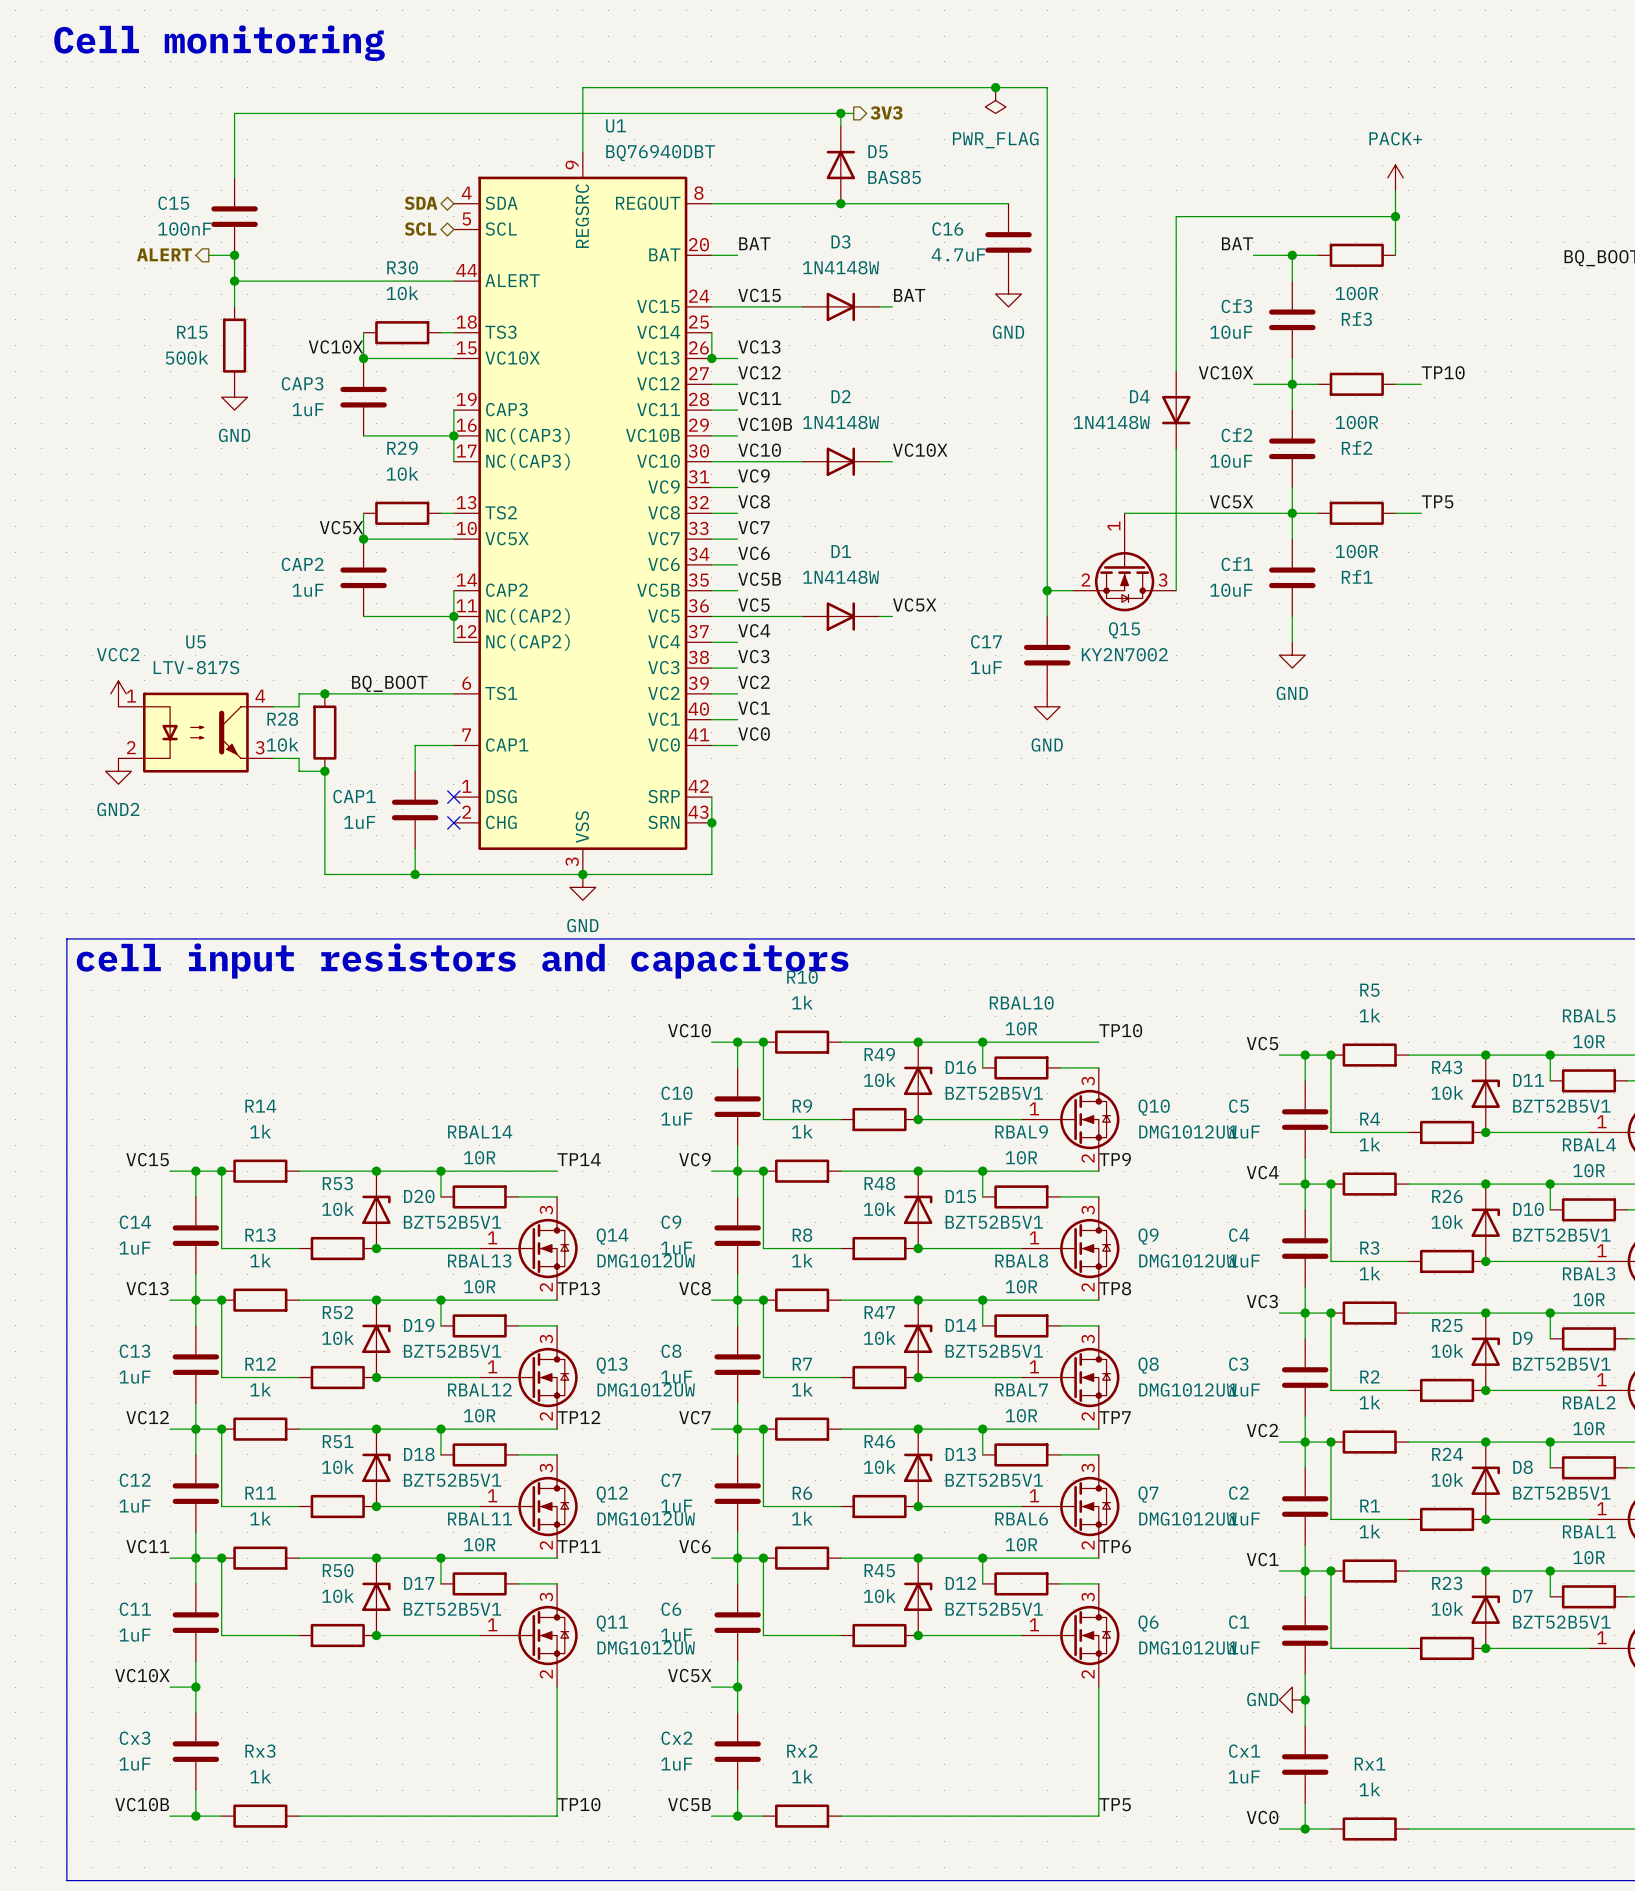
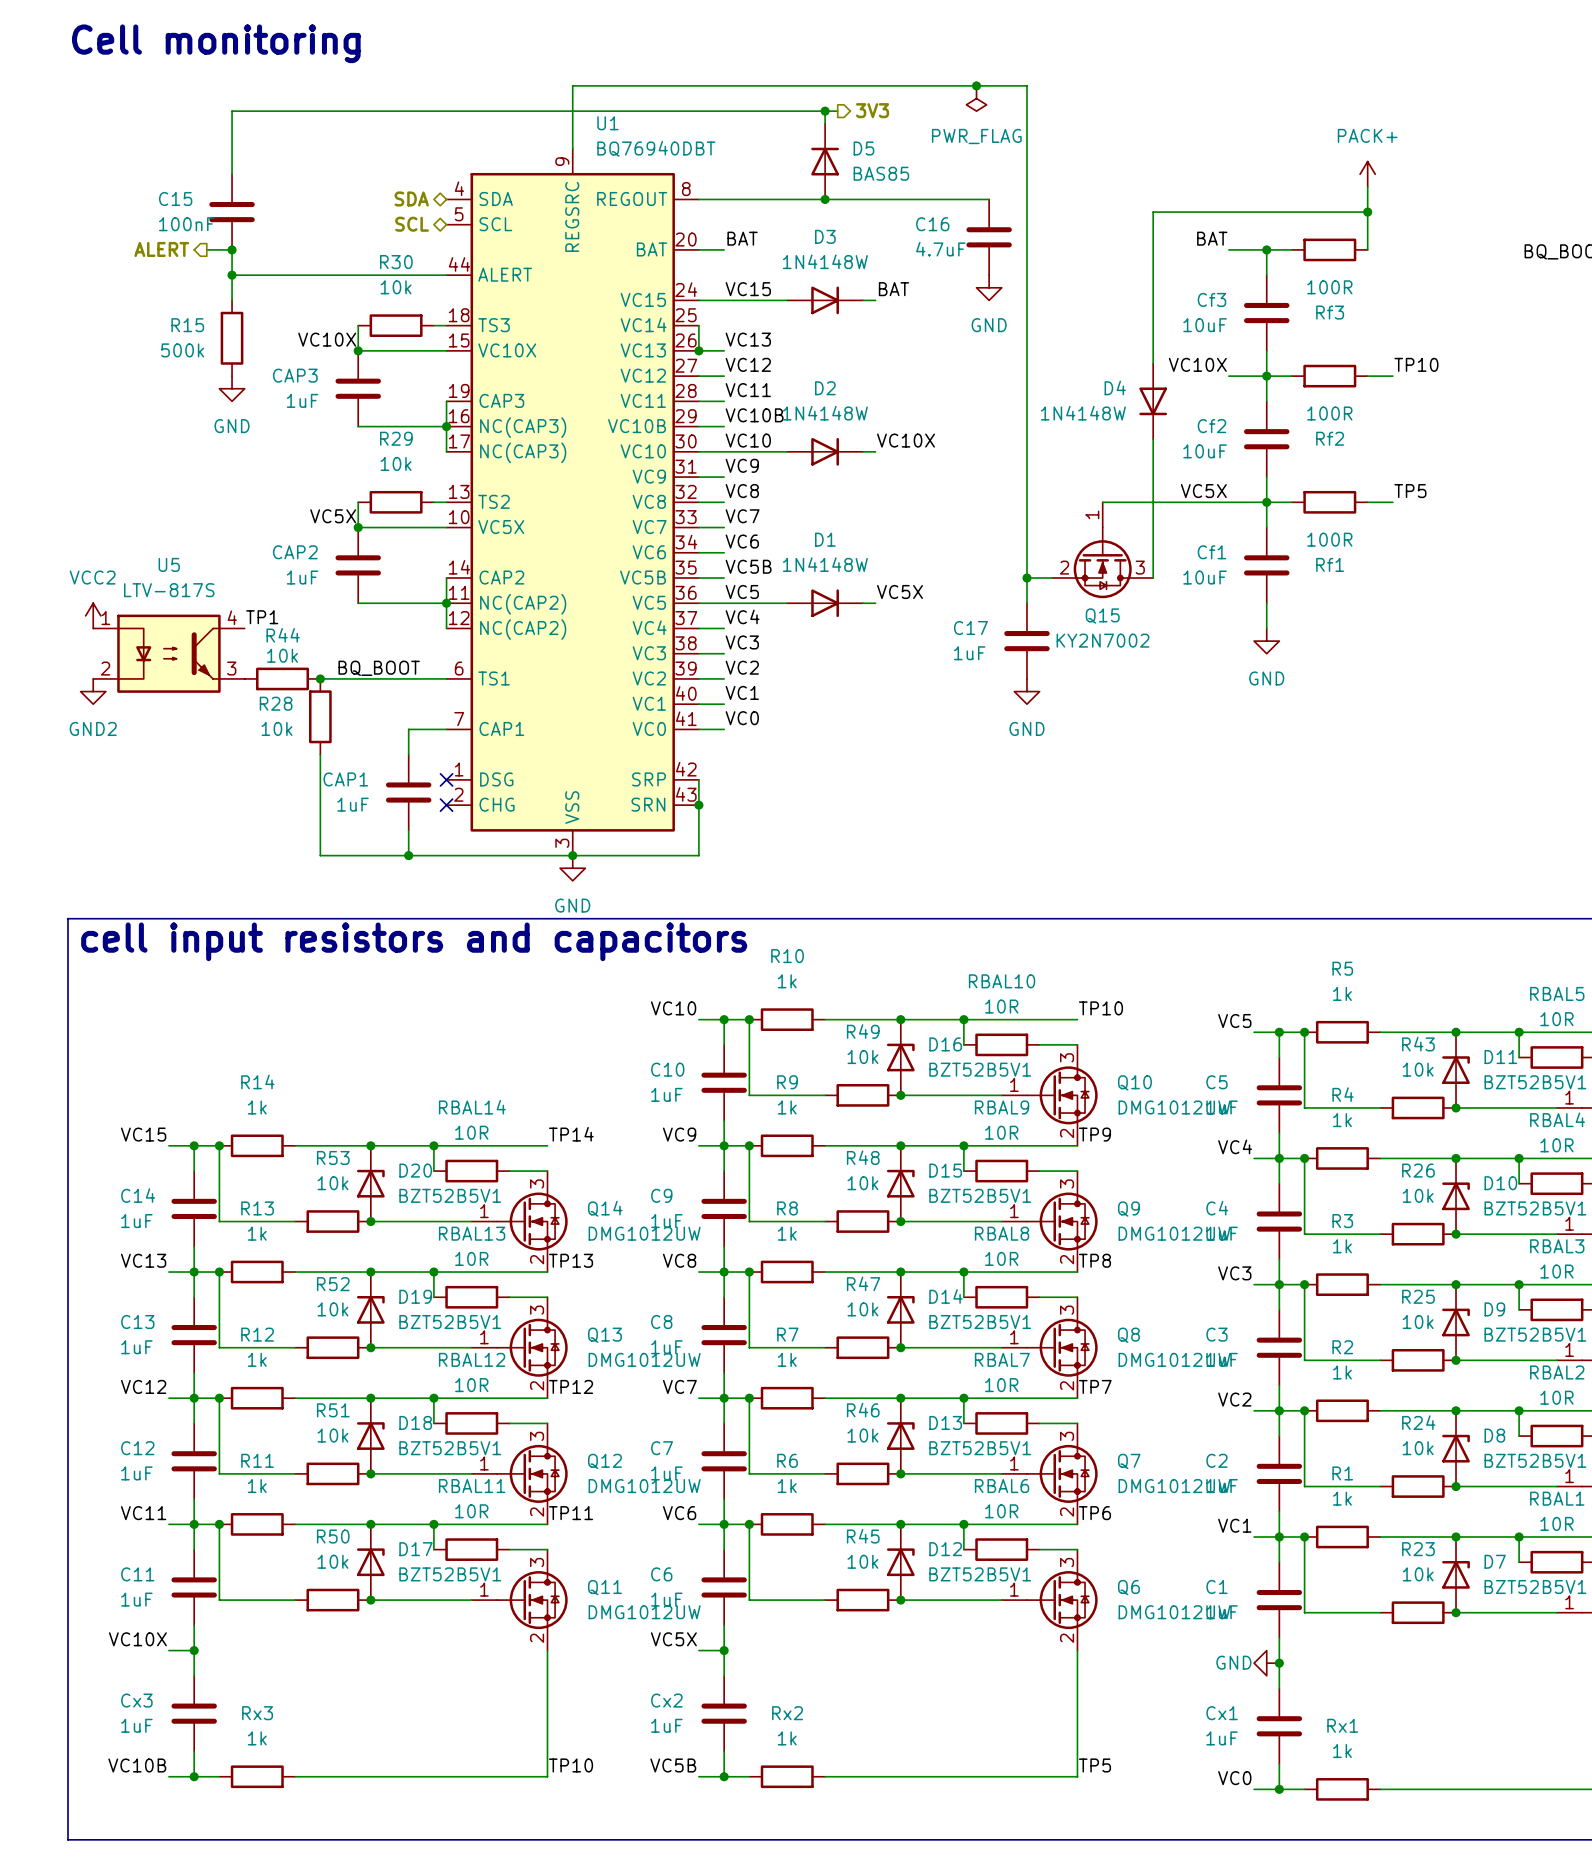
label: none -> TP1 (262, 617)
power symbol position: VCC2 (118, 693) -> VCC2 (93, 615)
R44: none -> 10k (282, 678)
wire: (324, 693) (299, 693) (299, 706) (273, 706) -> none
U5 position: (195, 732) -> (168, 653)
wire: (273, 758) (299, 758) (299, 771) (324, 771) -> none
power symbol position: GND2 (118, 771) -> GND2 (93, 691)
junction: (324, 771) -> none

